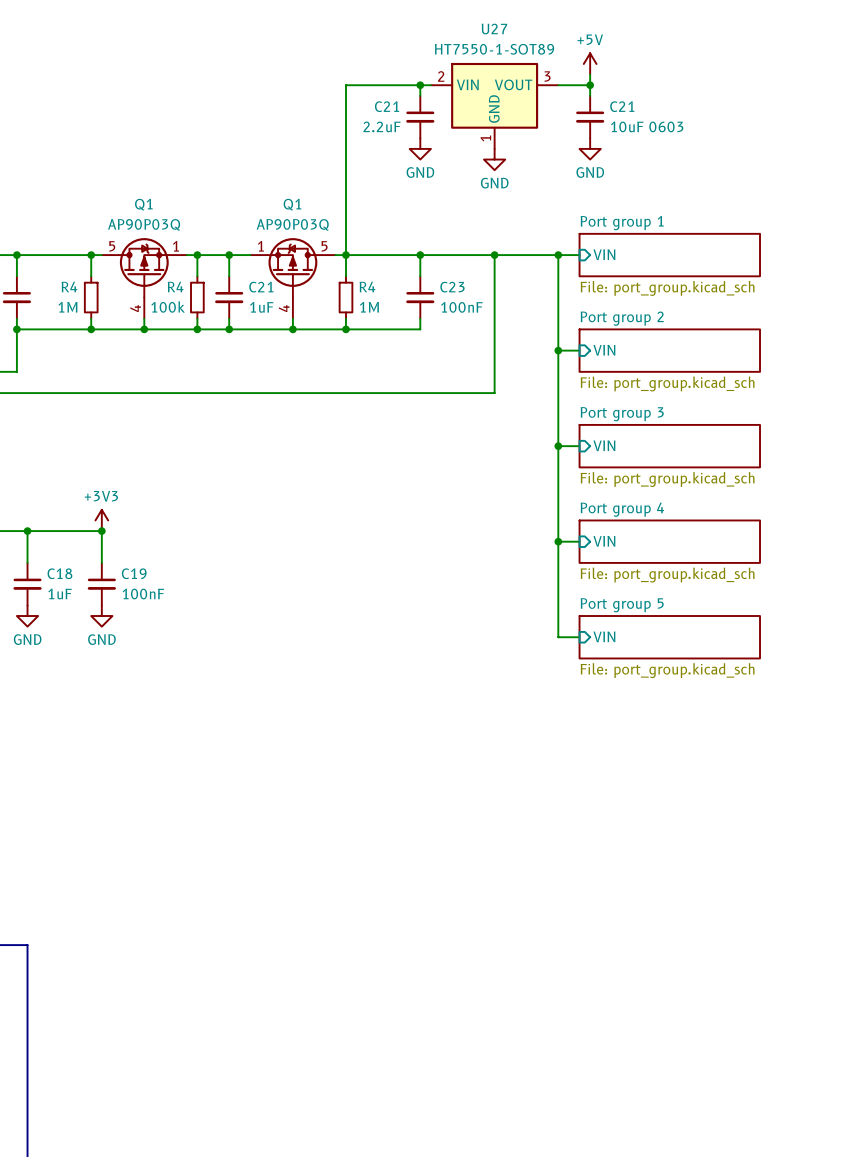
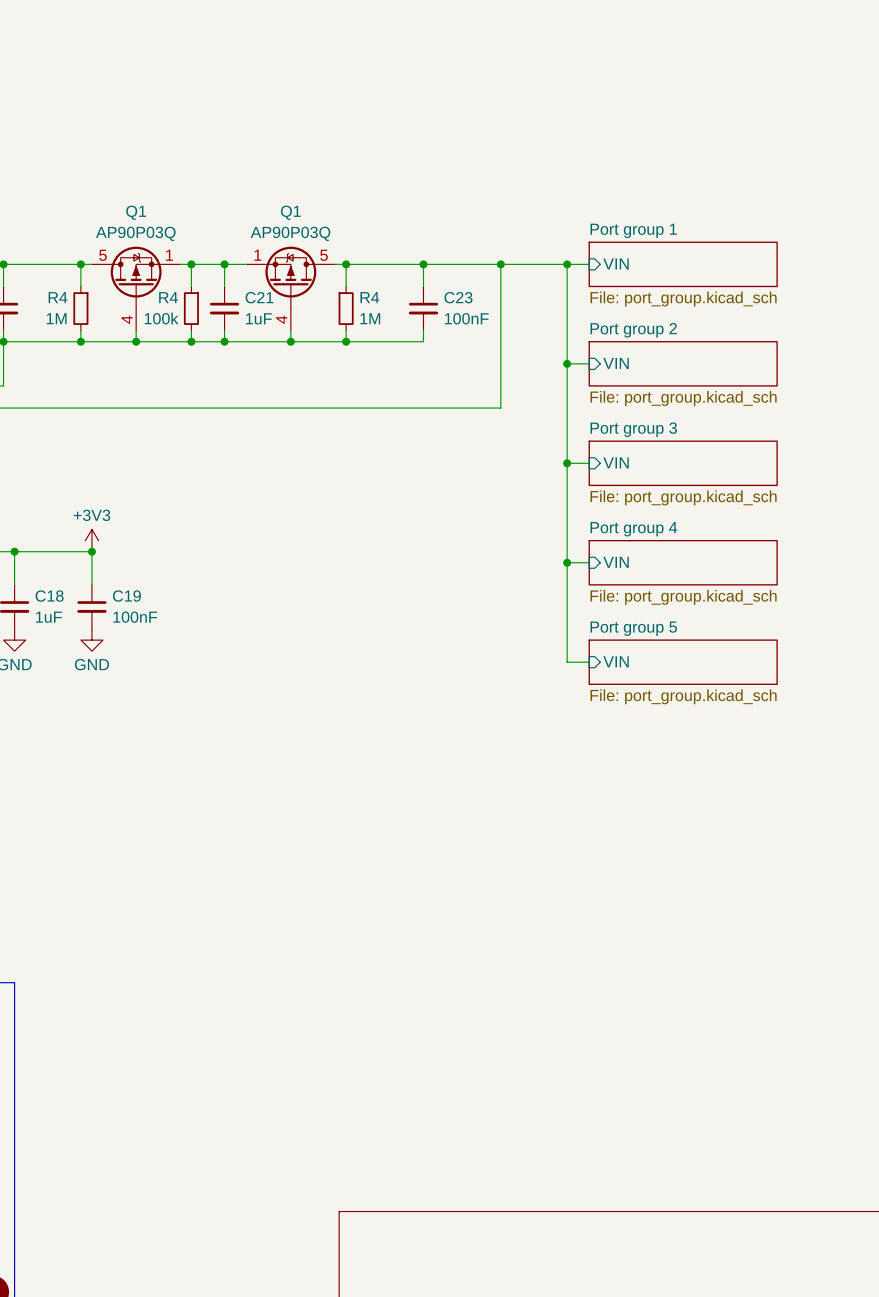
power symbol: +5V (590, 63) -> none
wire: (590, 74) (590, 95) -> none
wire: (420, 85) (420, 95) -> none
junction: (420, 85) -> none
wire: (430, 85) (345, 85) (345, 255) -> none
wire: (558, 85) (590, 85) -> none
junction: (590, 85) -> none
U27: HT7550-1-SOT89 (494, 105) -> none
C21: 2.2uF (420, 117) -> none
C21: 10uF 0603 (590, 117) -> none
power symbol: GND (420, 148) -> none
power symbol: GND (590, 148) -> none
power symbol: GND (494, 159) -> none

